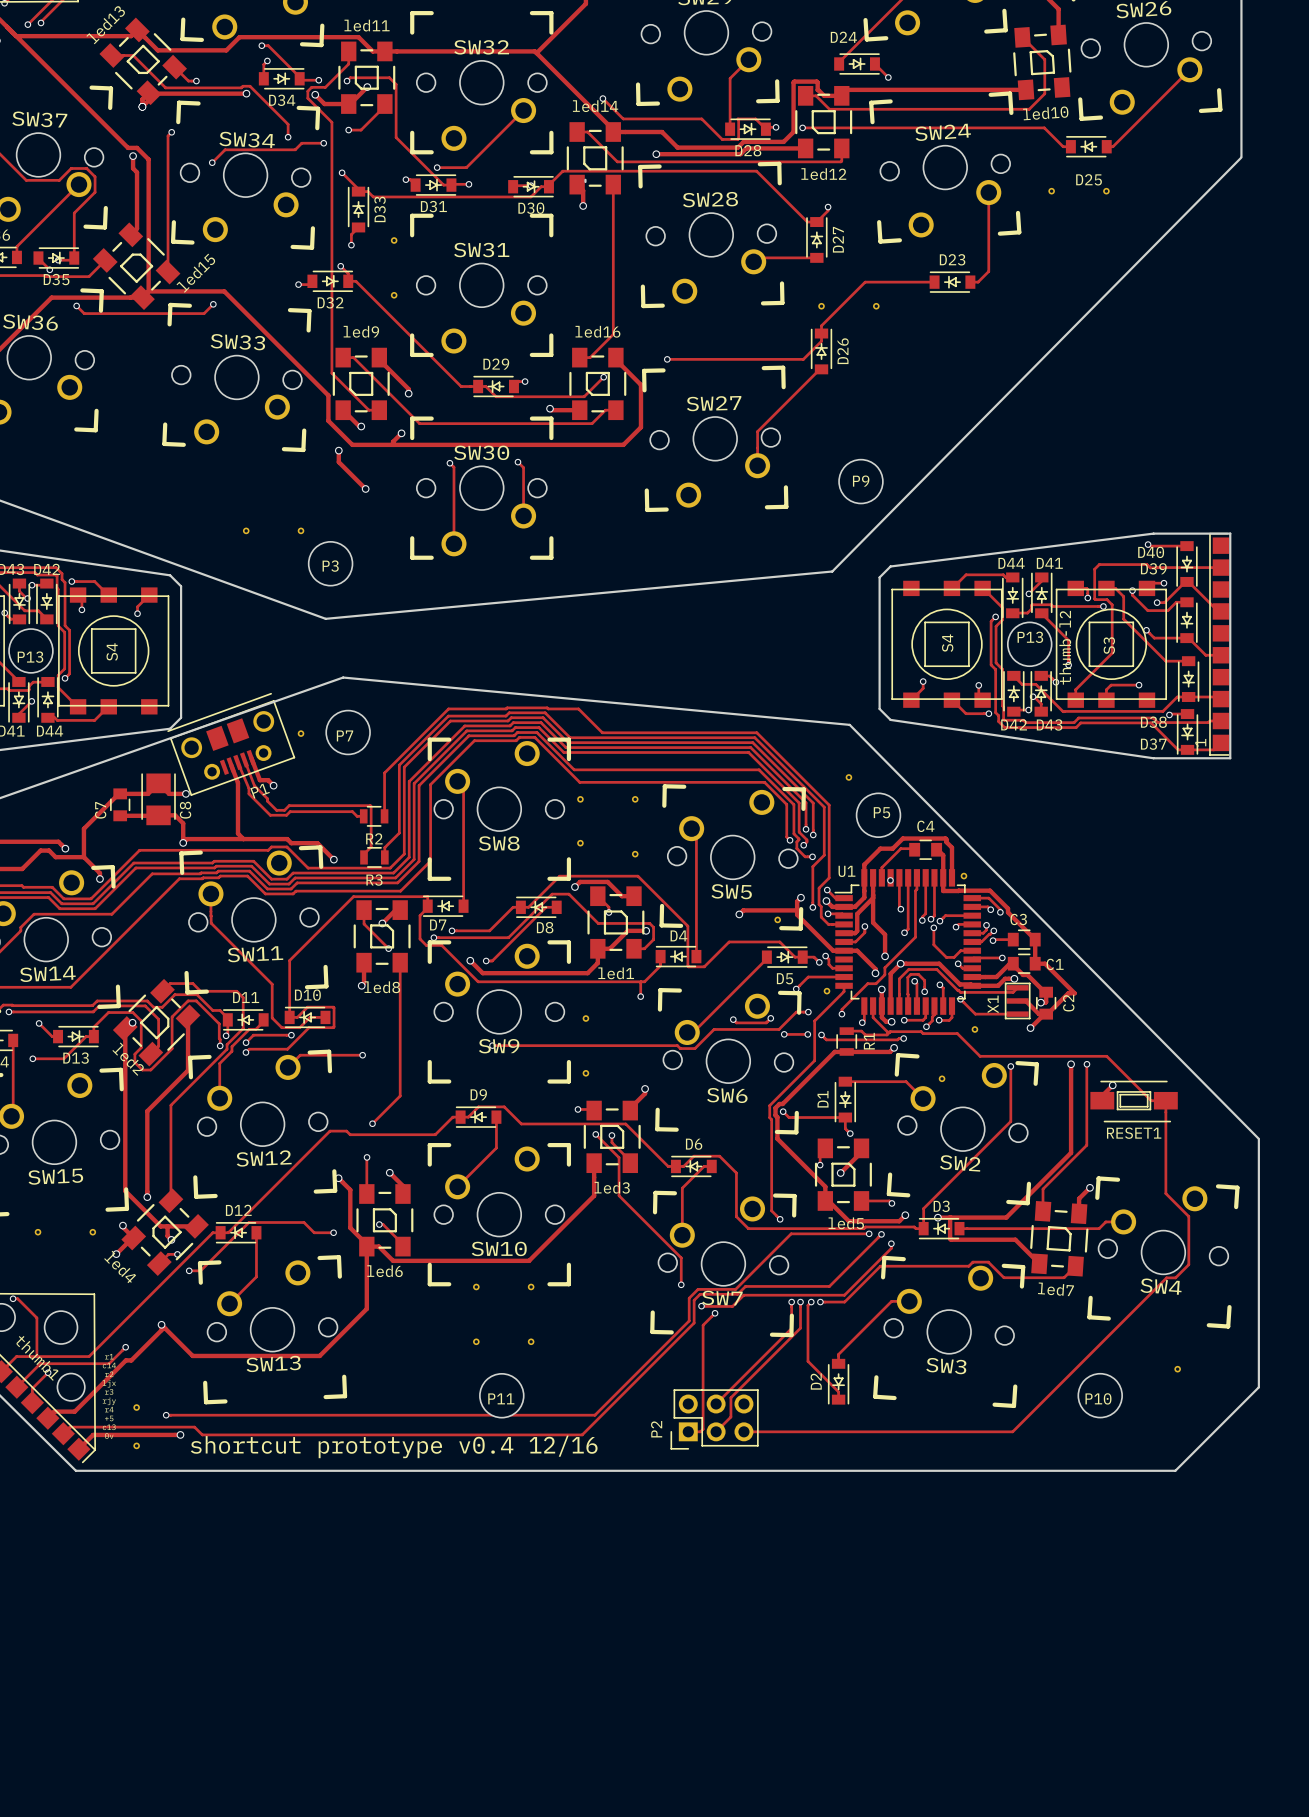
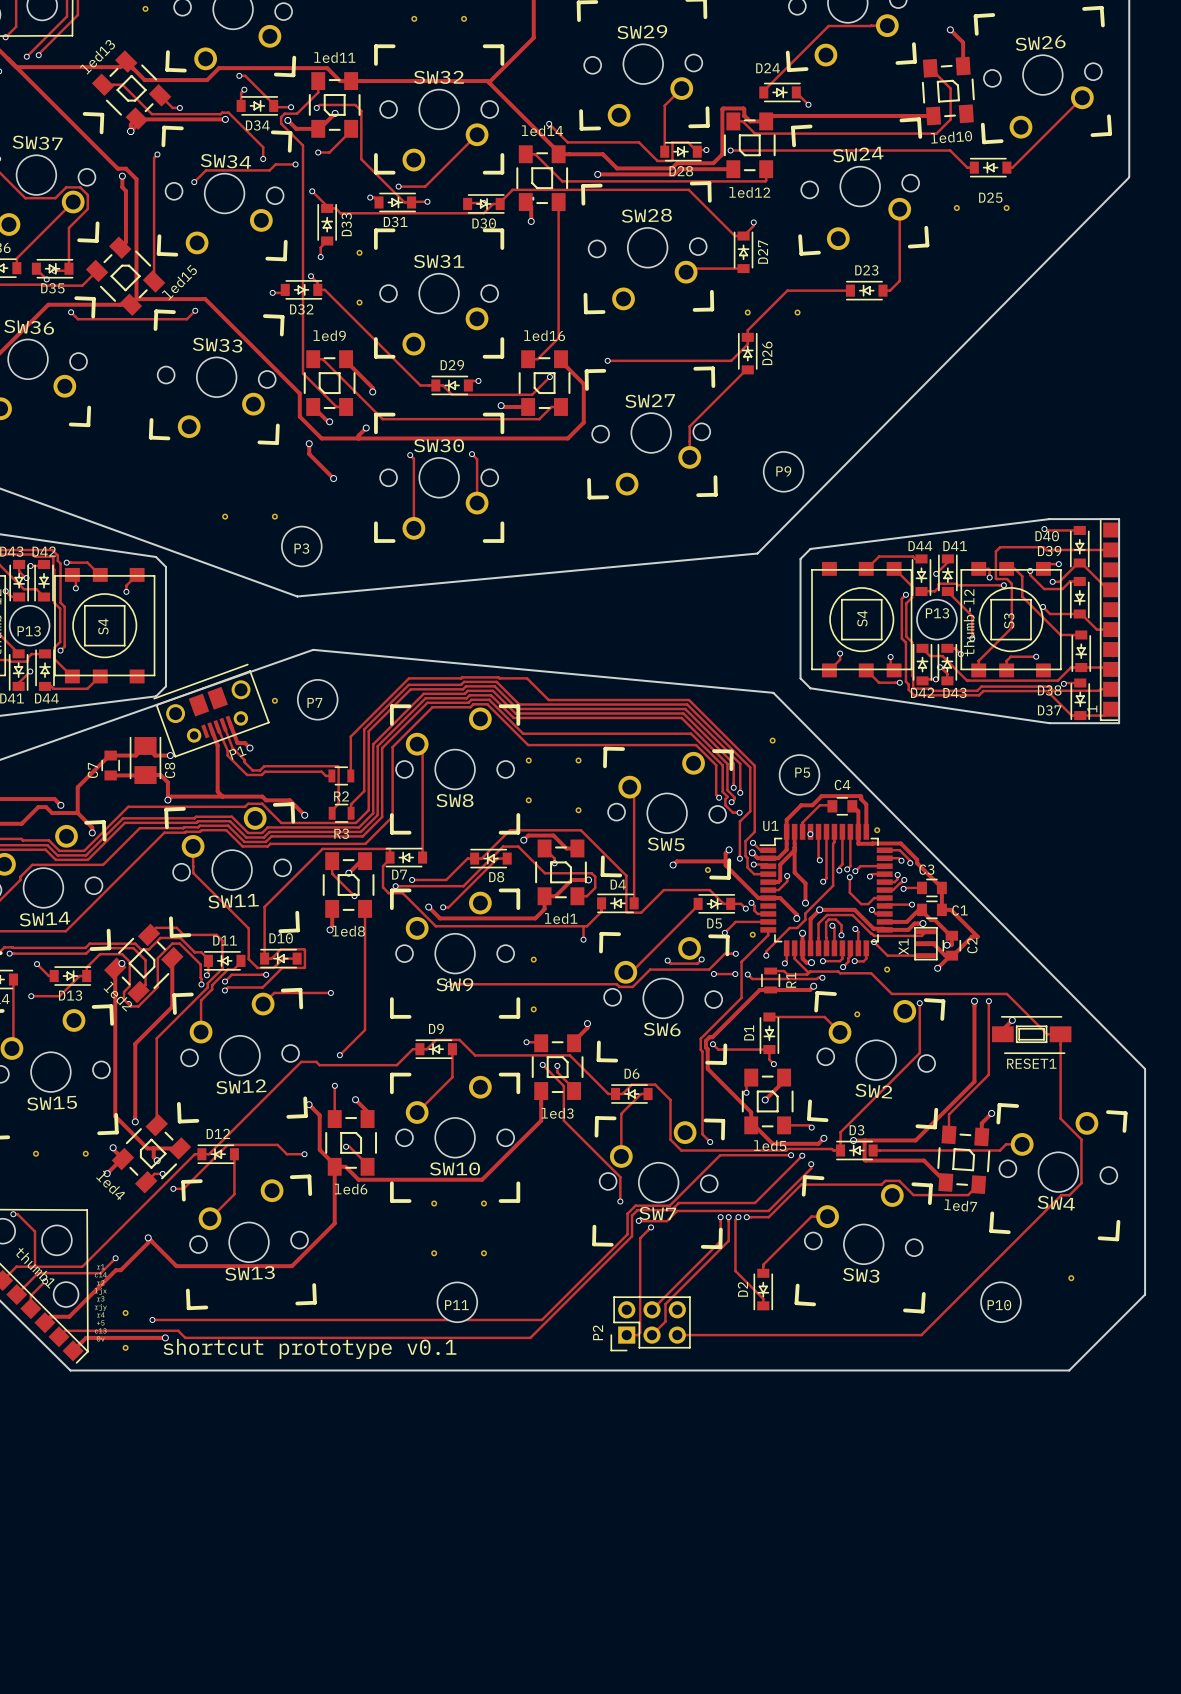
text: shortcut prototype v0.4 12/16 (394, 1446) -> shortcut prototype v0.1 (309, 1348)

